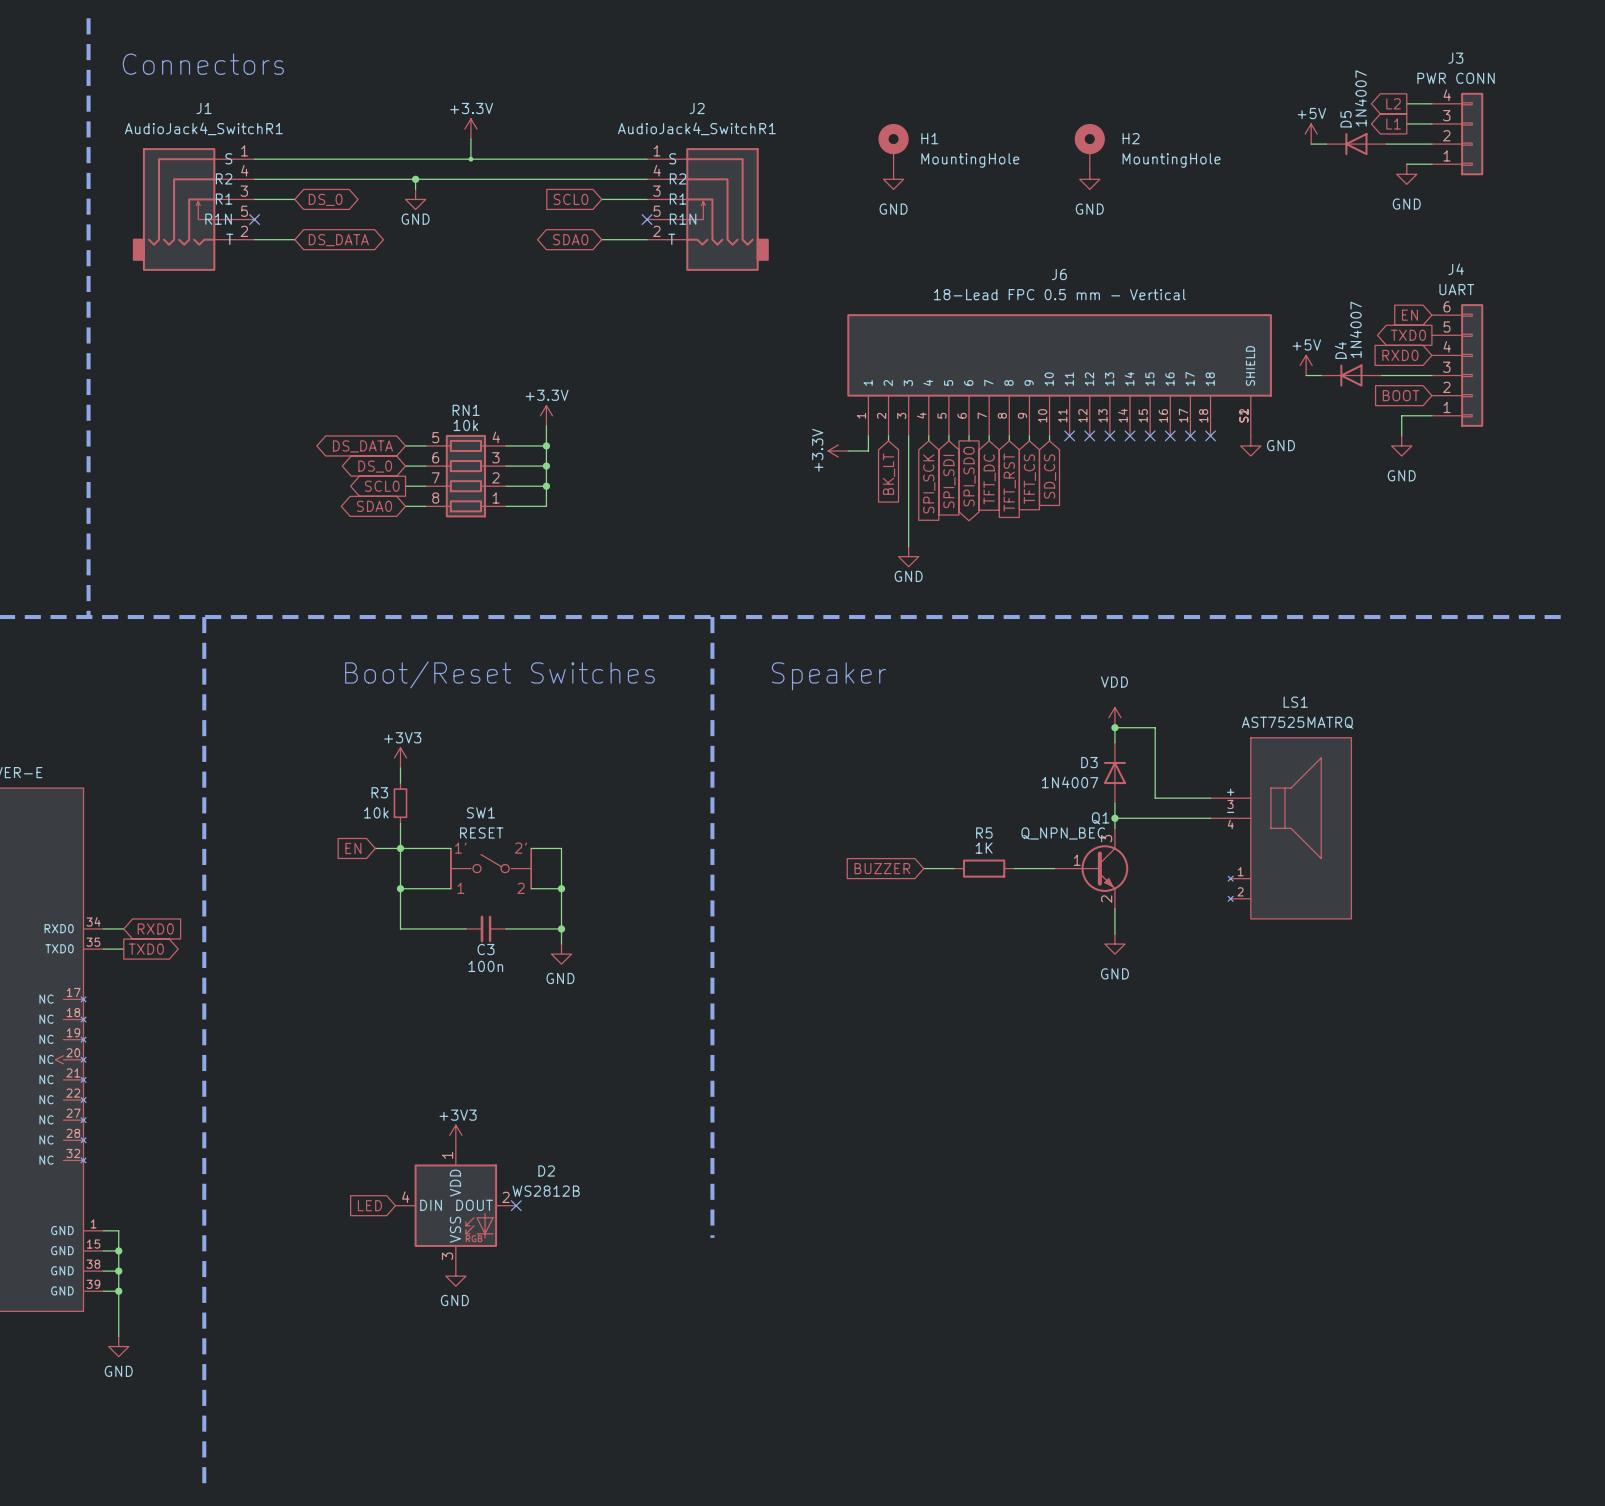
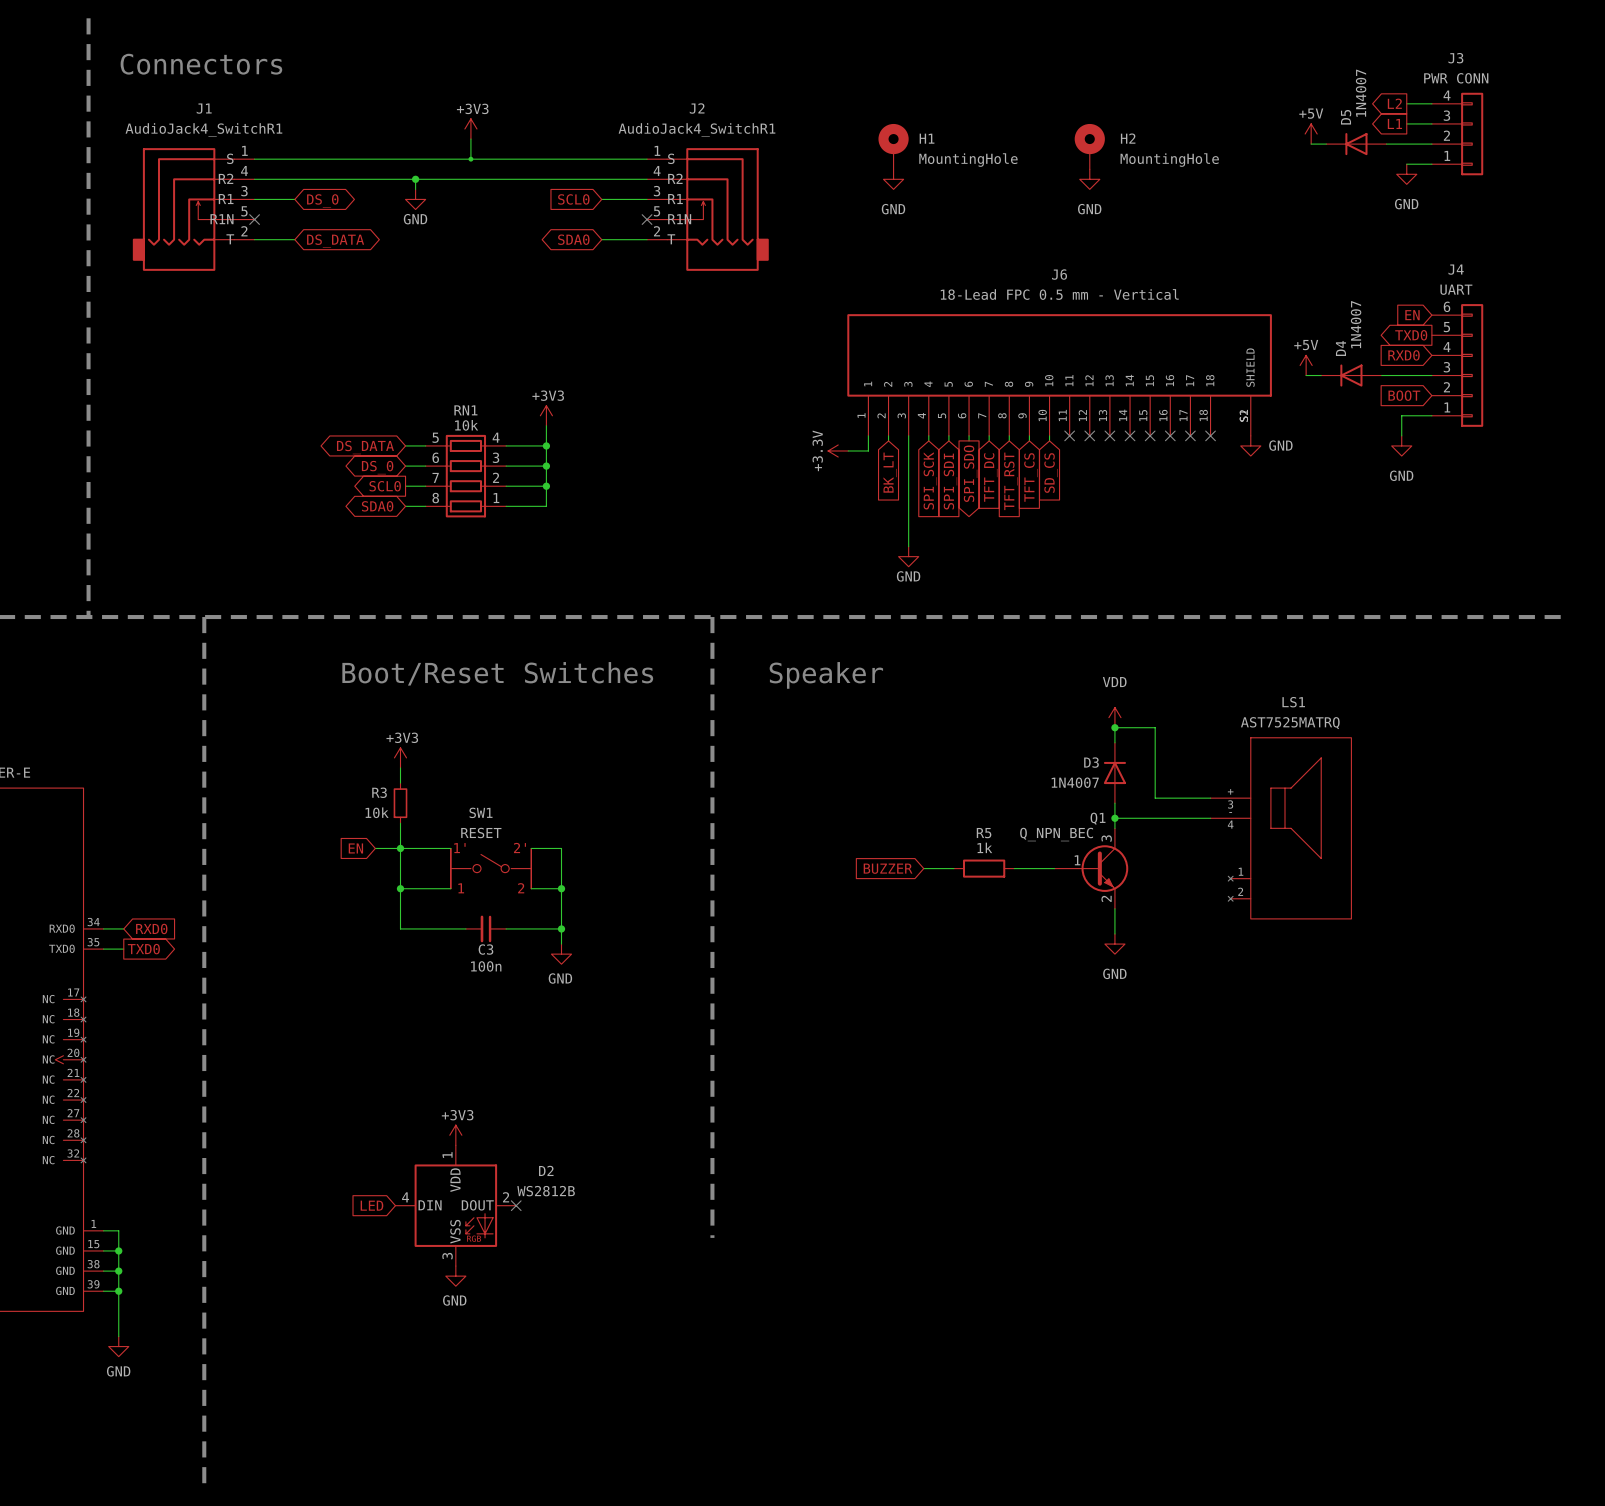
power symbol: +3.3V (470, 128) -> +3V3 (470, 128)
power symbol: +3.3V (546, 415) -> +3V3 (546, 415)
R5 value: 1K (984, 848) -> 1k (984, 847)

